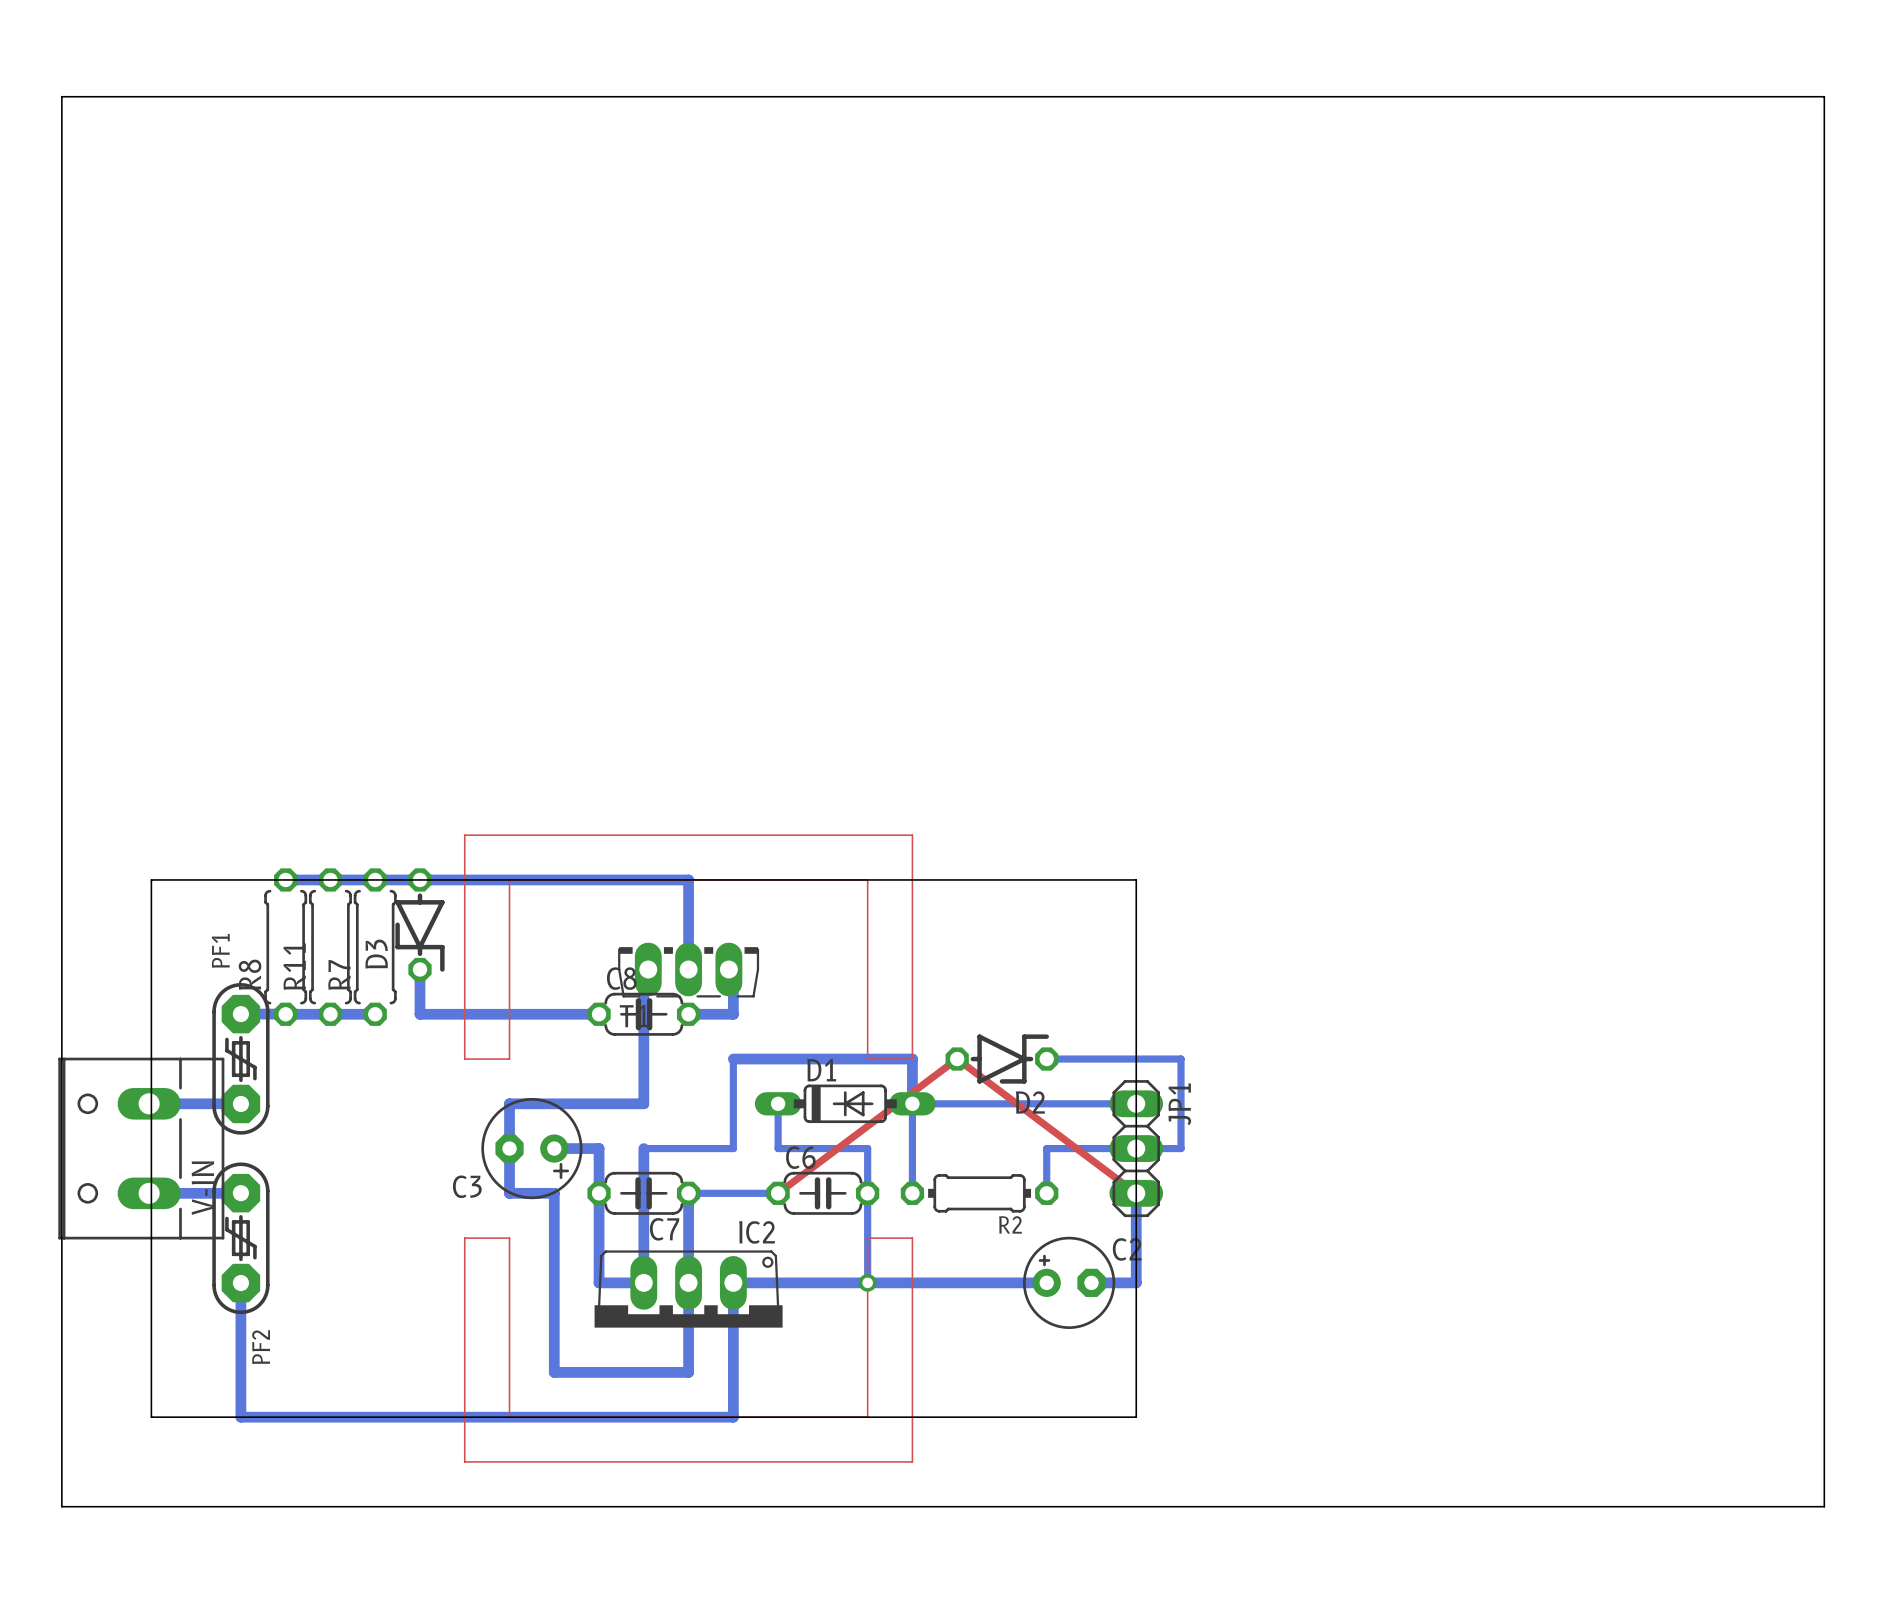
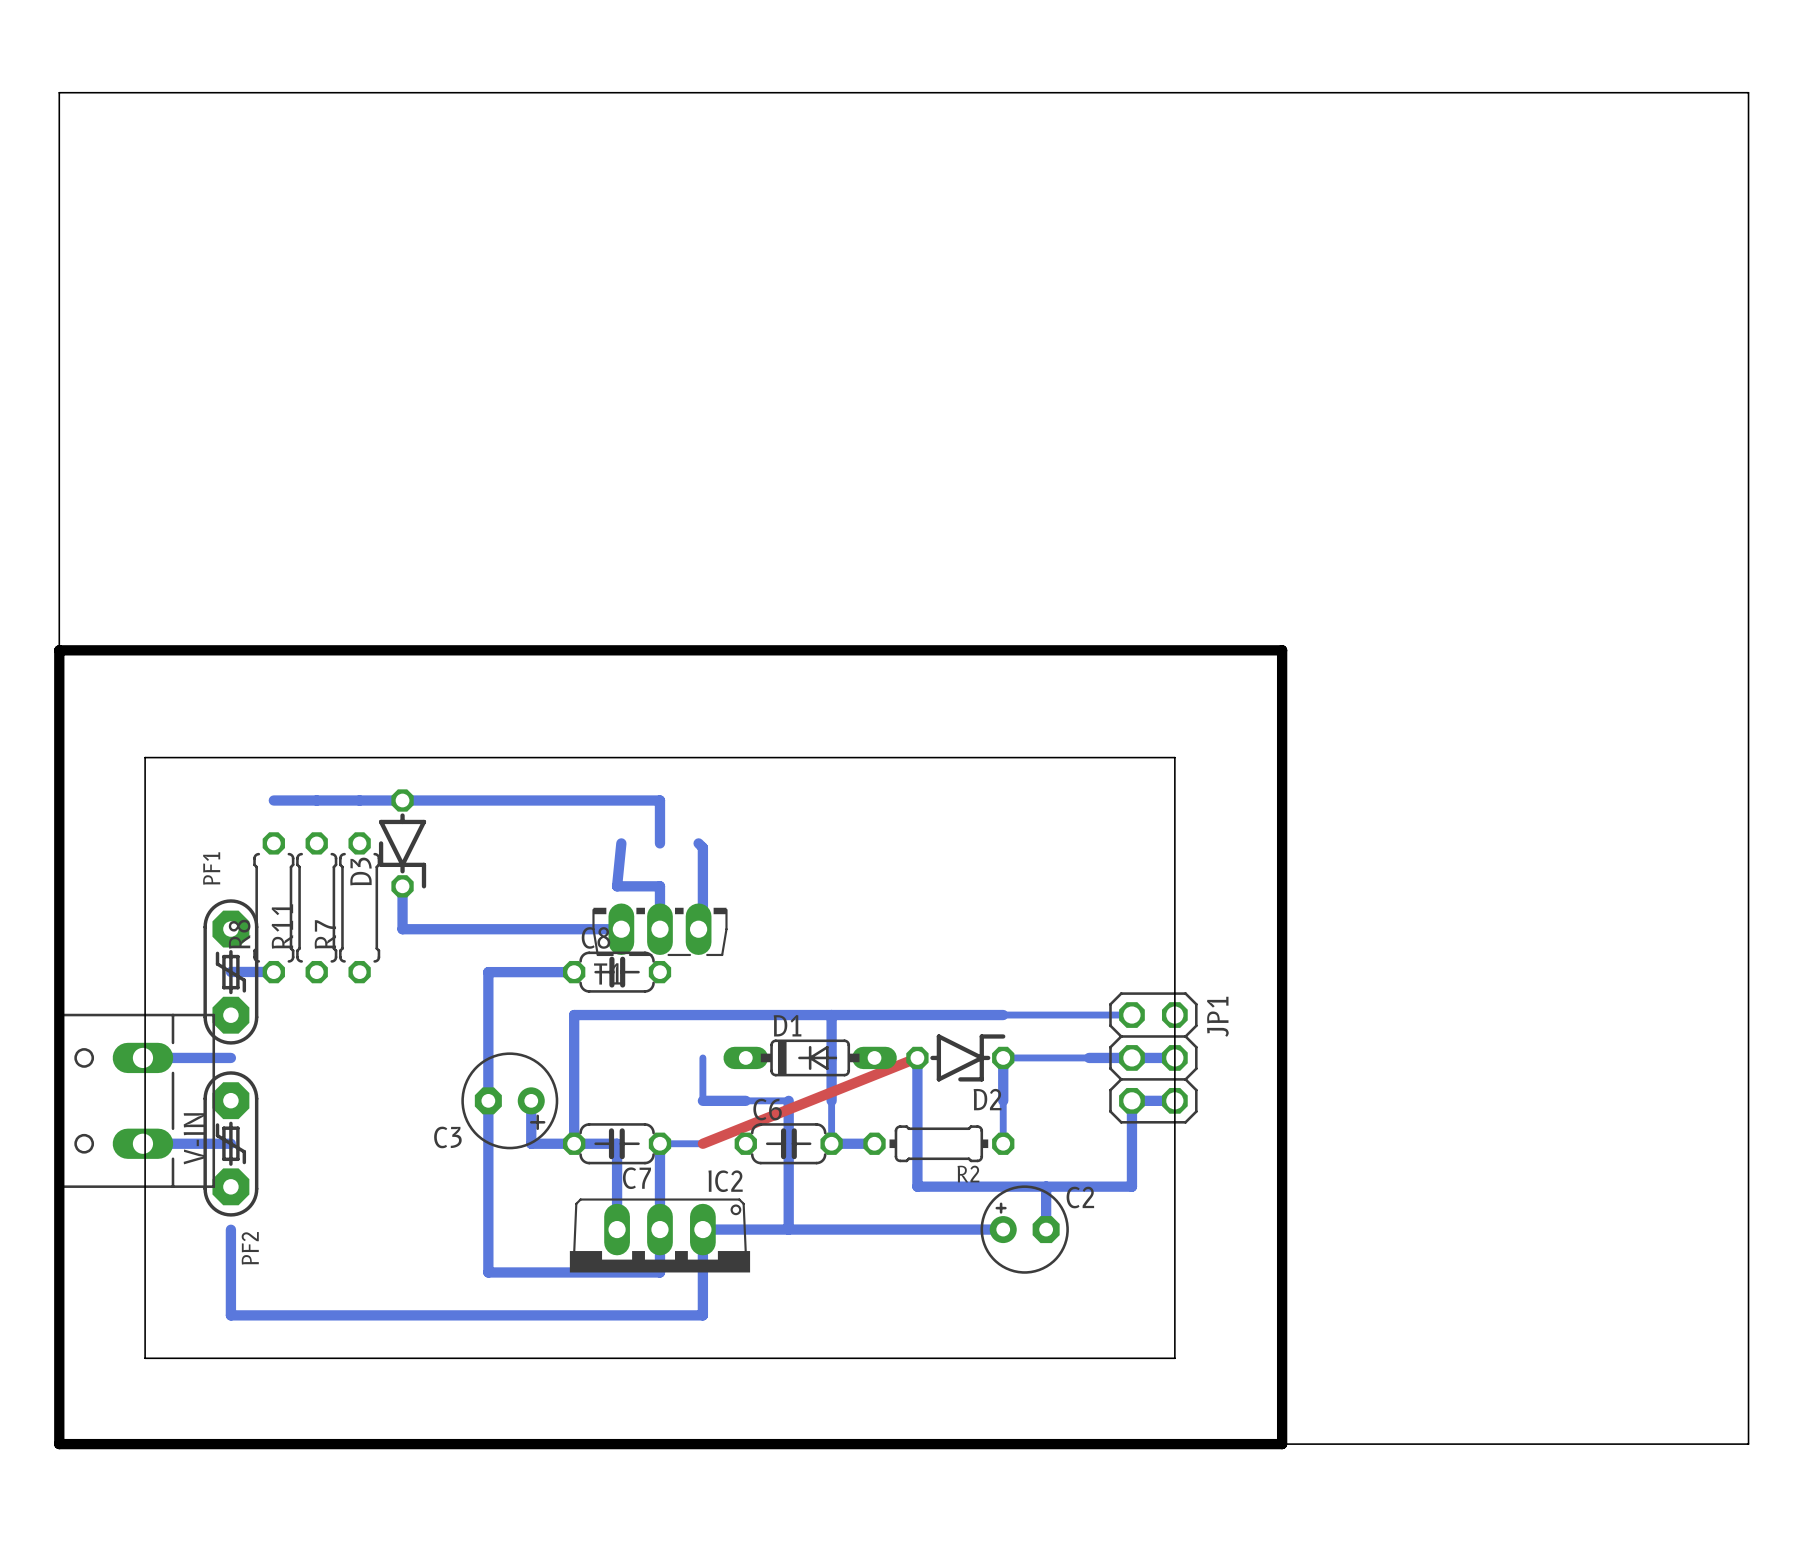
board edge: none -> (59, 650) (1282, 650) (1282, 1444)
board edge width: thin (61, 678) (61, 1506) (1337, 1506) -> thick (59, 650) (59, 1444) (1282, 1444)
bottom track: none -> (273, 800) (659, 800) (659, 843)
top track: (464, 835) (464, 1059) (509, 1059) (509, 879) (867, 879) (867, 1059) (912, 1059) (912, 835) (464, 835) -> none
board edge: (151, 879) (1136, 879) (1136, 1417) -> (145, 843) (145, 757) (1174, 757) (1174, 1358) (1089, 1358)
bottom track: (285, 879) (688, 879) (688, 924) -> (621, 843) (617, 886) (659, 886)
bottom track: none -> (698, 843) (702, 847) (702, 929)
bottom track: none -> (402, 886) (402, 929) (617, 929)
D3 position: (419, 924) -> (402, 843)
bottom track: (419, 969) (419, 1014) (509, 1014) -> none
bottom track: (648, 969) (643, 969) (643, 1103) (509, 1103) -> (488, 972) (488, 1057)
bottom track: (728, 969) (733, 969) (733, 1014) (688, 1014) -> none
bottom track: (285, 1014) (375, 1014) -> none
PF1 position: (240, 1058) -> (230, 971)
bottom track: (733, 1059) (733, 1103) -> (702, 1015) (574, 1015) (574, 1100)
bottom track: (912, 1059) (912, 1103) -> (874, 1015) (1003, 1015)
D2 position: (1001, 1059) -> (960, 1057)
bottom track: (1181, 1059) (1181, 1148) (1046, 1148) -> (1003, 1057) (1003, 1100)
JP1 footprint: [1109, 1080, 1164, 1218] -> [1109, 992, 1198, 1124]
bottom track: (778, 1103) (778, 1148) -> (702, 1100) (745, 1100)
bottom track: (912, 1103) (912, 1193) -> (831, 1143) (874, 1143)
bottom track: (912, 1103) (1046, 1103) -> none
bottom track: none -> (917, 1057) (917, 1186) (1131, 1186) (1131, 1100) (1174, 1100)
top track: none -> (917, 1057) (702, 1143)
bottom track: none -> (1089, 1057) (1174, 1057)
bottom track: (554, 1148) (599, 1148) -> (531, 1100) (531, 1143) (617, 1143)
bottom track: (733, 1148) (643, 1148) (643, 1193) -> none
bottom track: (822, 1148) (867, 1148) -> (831, 1015) (831, 1100)
bottom track: none -> (788, 1100) (788, 1229)
bottom track: (509, 1193) (554, 1193) (554, 1372) -> (488, 1143) (488, 1272) (659, 1272)
bottom track: (599, 1193) (599, 1282) (643, 1282) -> none
bottom track: (733, 1193) (778, 1193) -> none
top track: (778, 1193) (957, 1059) (1136, 1193) -> none
bottom track: (867, 1193) (867, 1282) -> none
bottom track: (1136, 1193) (1136, 1282) (1091, 1282) -> (1046, 1186) (1046, 1229)
PF2 position: (240, 1238) -> (230, 1143)
top track: (464, 1238) (464, 1461) (912, 1461) (912, 1238) (867, 1238) (867, 1417) (509, 1417) (509, 1238) (464, 1238) -> none
via: (867, 1282) -> none
bottom track: (688, 1327) (688, 1372) -> (702, 1315) (659, 1315)
bottom track: (240, 1372) (240, 1417) (733, 1417) (733, 1372) -> (230, 1315) (531, 1315)

